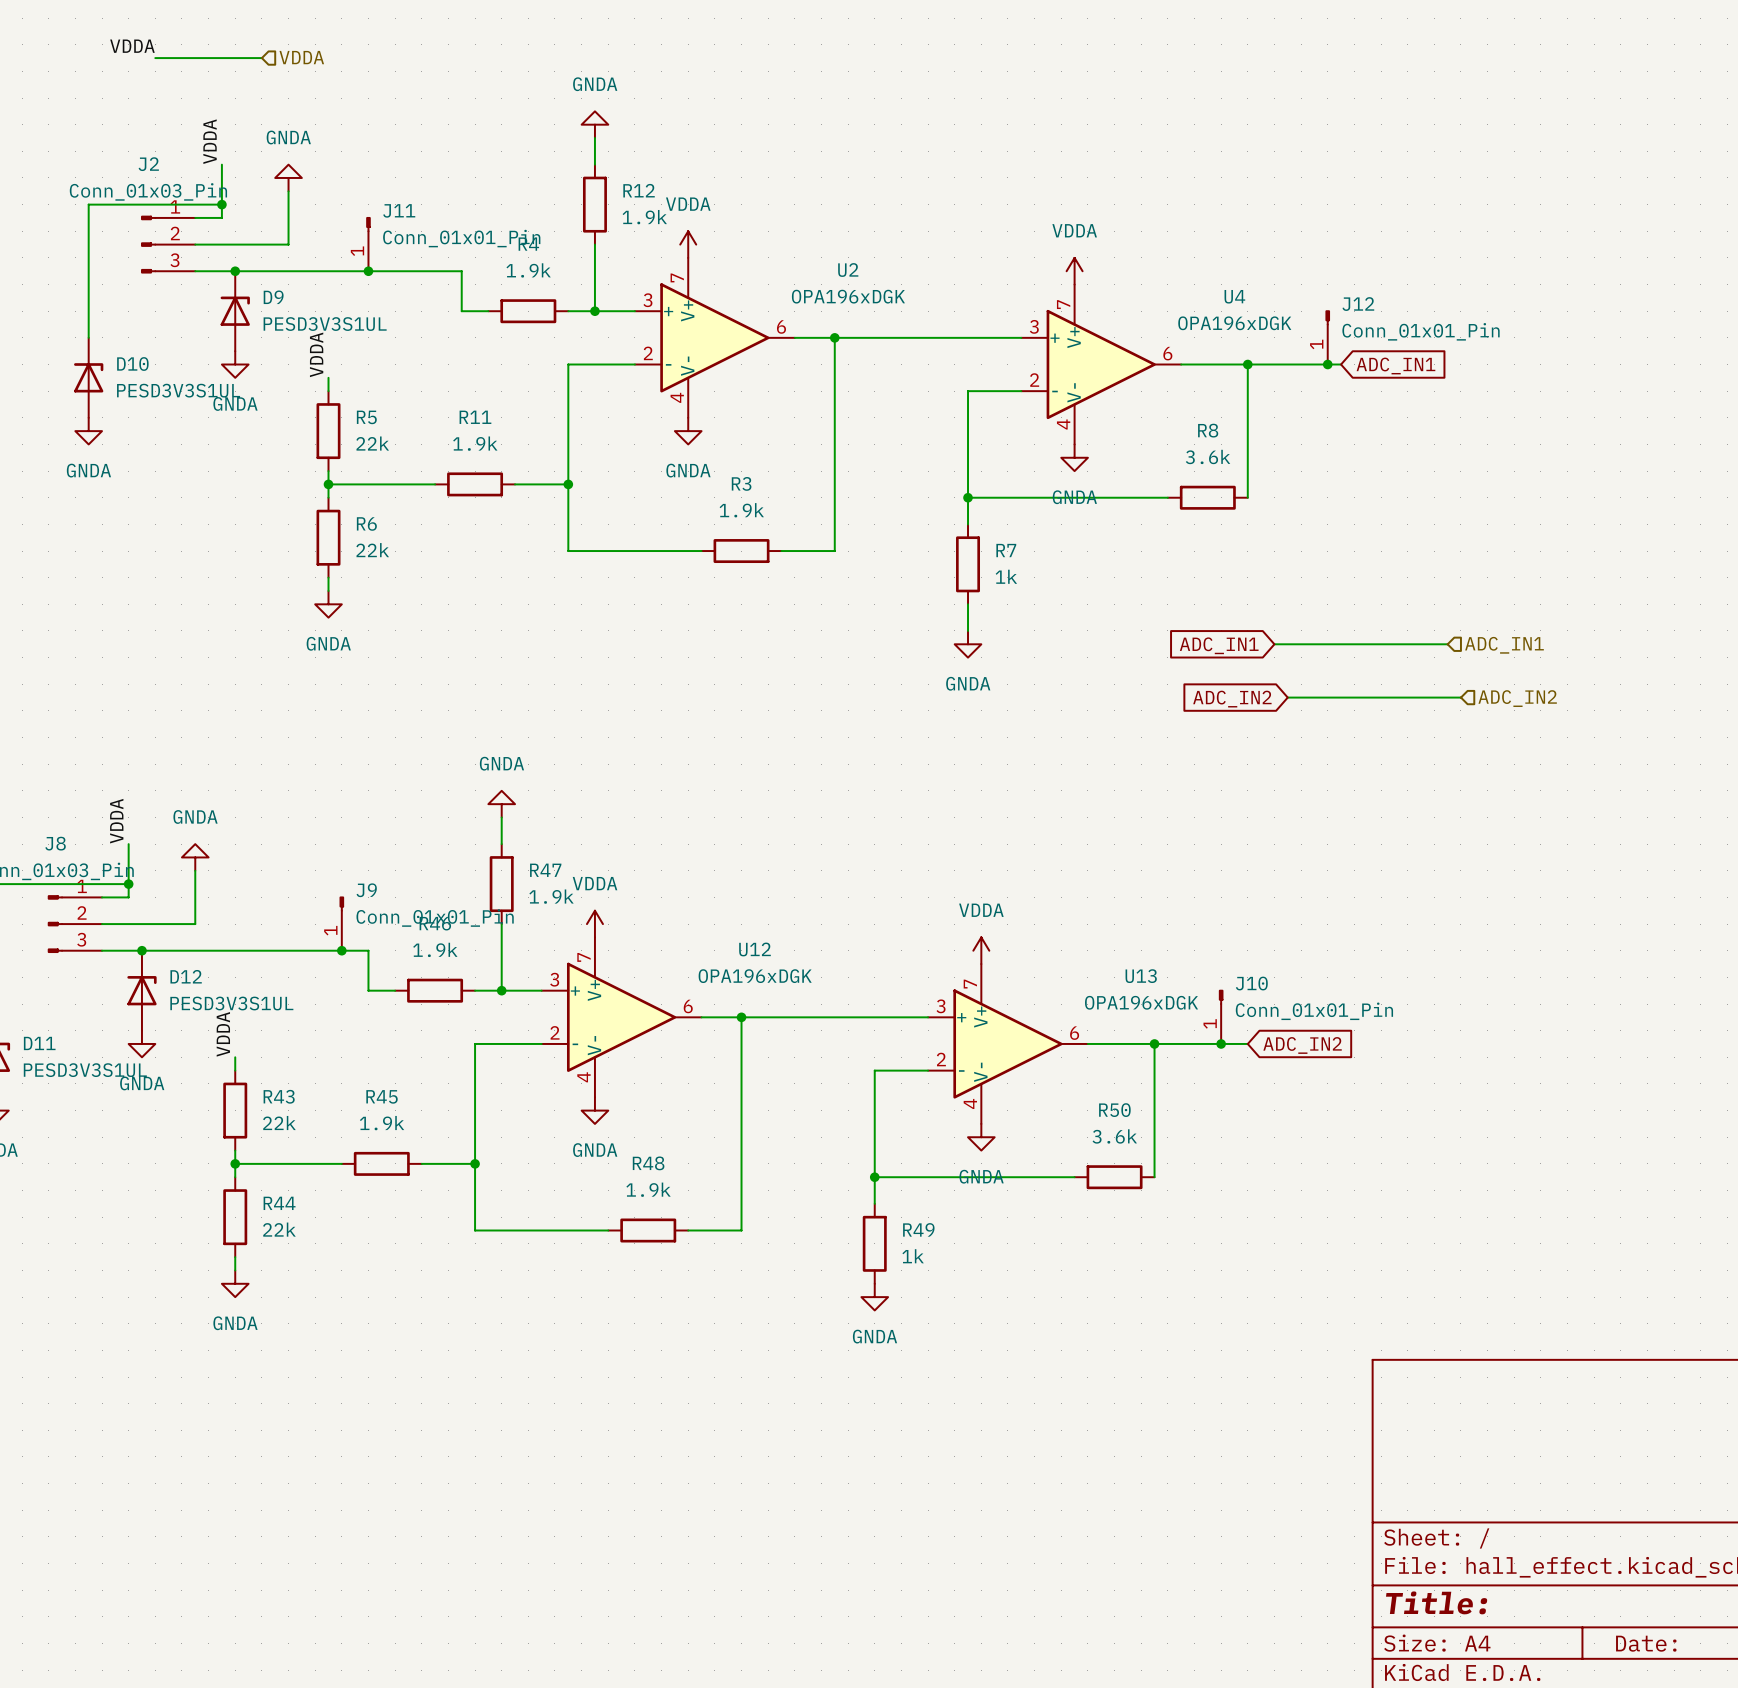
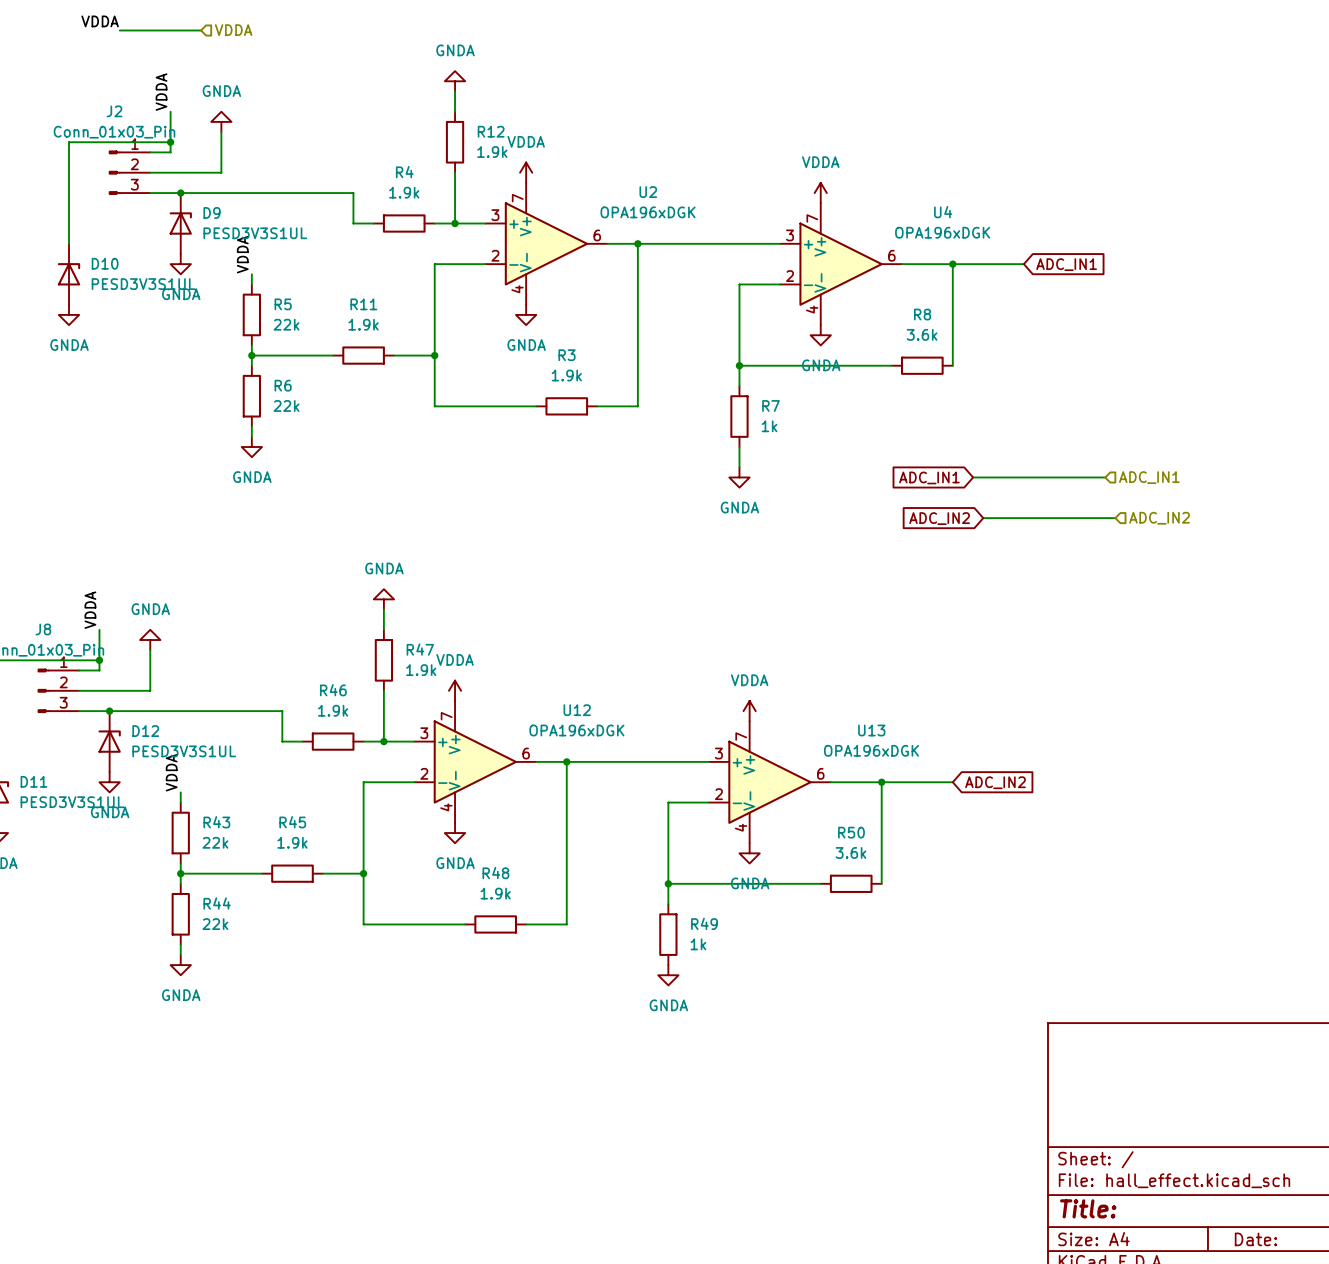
J11: Conn_01x01_Pin (368, 244) -> none
junction: (368, 271) -> none
J12: Conn_01x01_Pin (1327, 337) -> none
junction: (1327, 364) -> none
J9: Conn_01x01_Pin (341, 923) -> none
junction: (341, 950) -> none
J10: Conn_01x01_Pin (1221, 1016) -> none
junction: (1221, 1043) -> none

